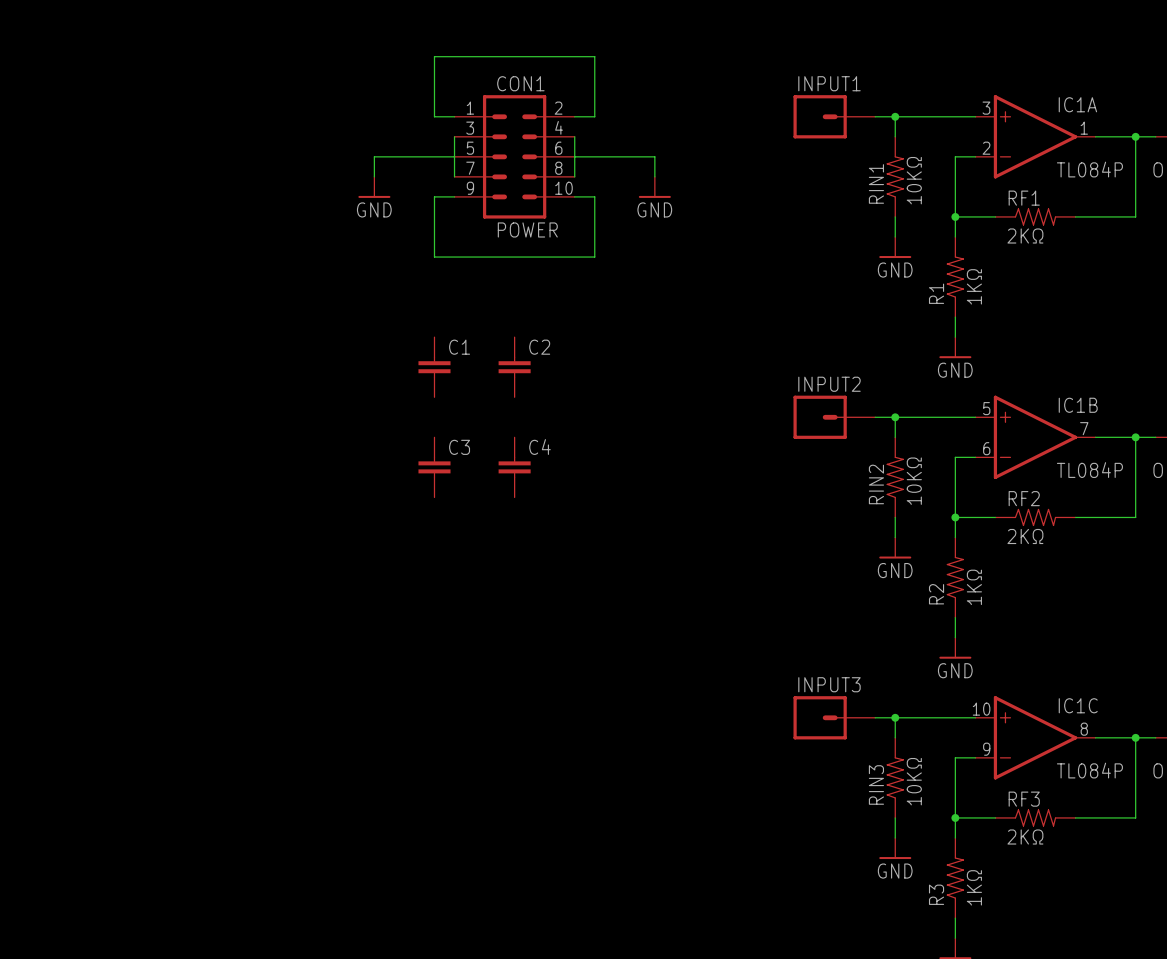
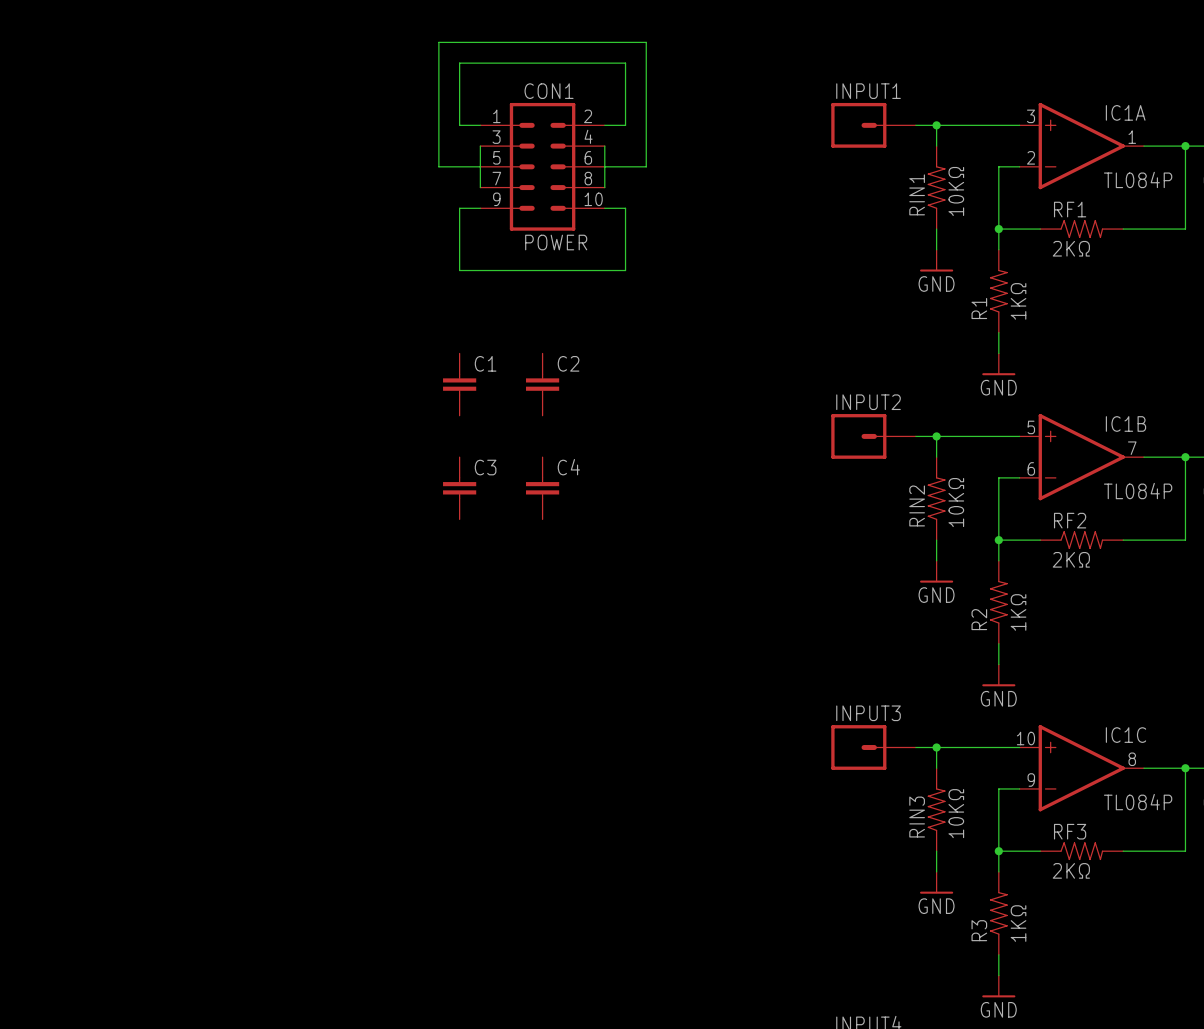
wire: (414, 156) (374, 156) (374, 176) -> (438, 166) (438, 42) (646, 42) (646, 166)
wire: (614, 156) (654, 156) (654, 176) -> none
power symbol: GND (374, 187) -> none
power symbol: GND (654, 187) -> none

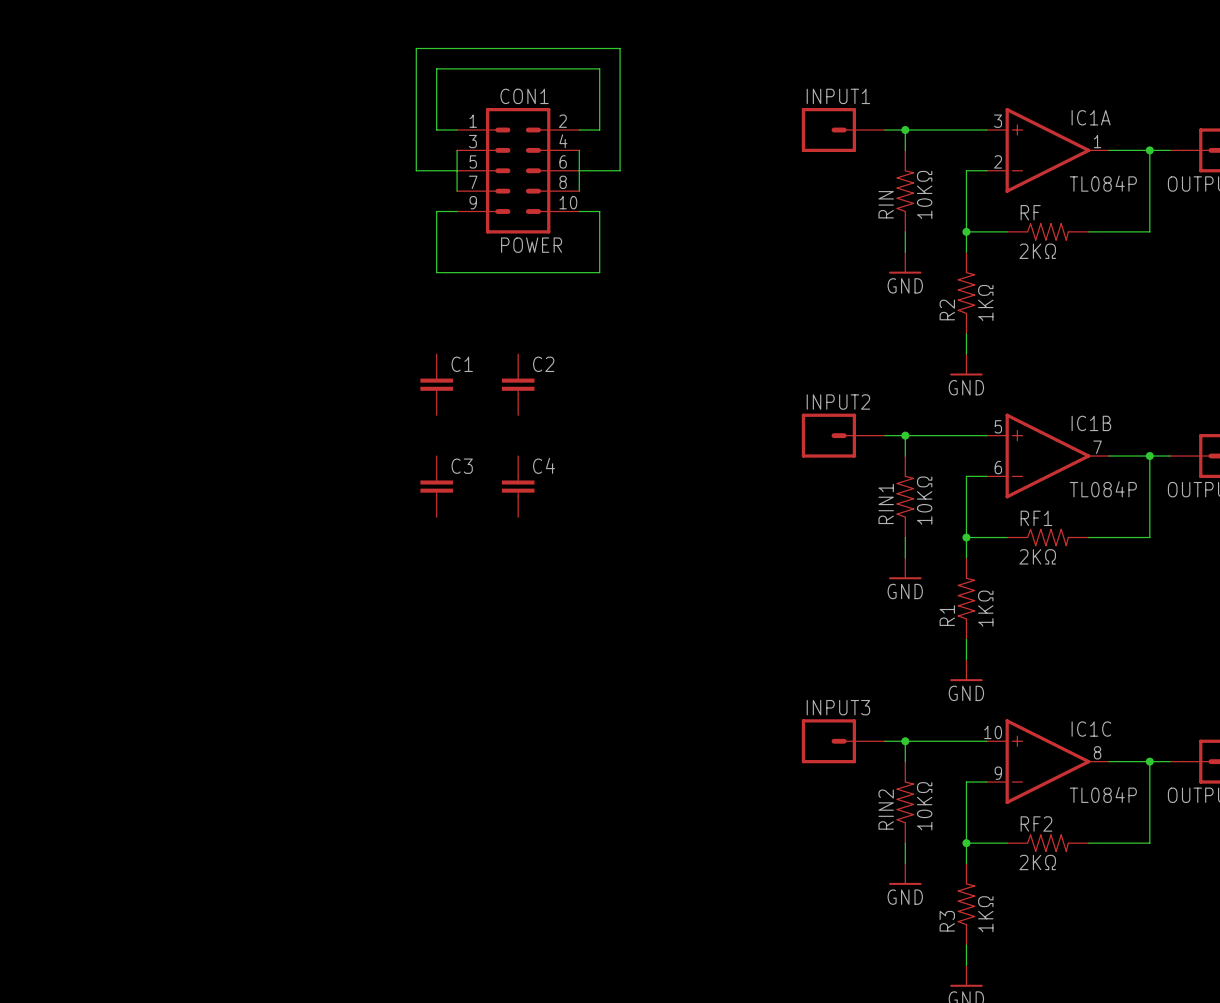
RIN1 name: RIN1 (917, 194) -> RIN (886, 204)
RF1 name: RF1 (1070, 209) -> RF (1030, 212)
R1 name: R1 (979, 308) -> R2 (947, 309)
RIN2 name: RIN2 (917, 505) -> RIN1 (886, 503)
RF2 name: RF2 (1070, 520) -> RF1 (1036, 518)
R2 name: R2 (979, 619) -> R1 (947, 615)
RIN3 name: RIN3 (917, 817) -> RIN2 (886, 809)
RF3 name: RF3 (1070, 831) -> RF2 (1036, 823)

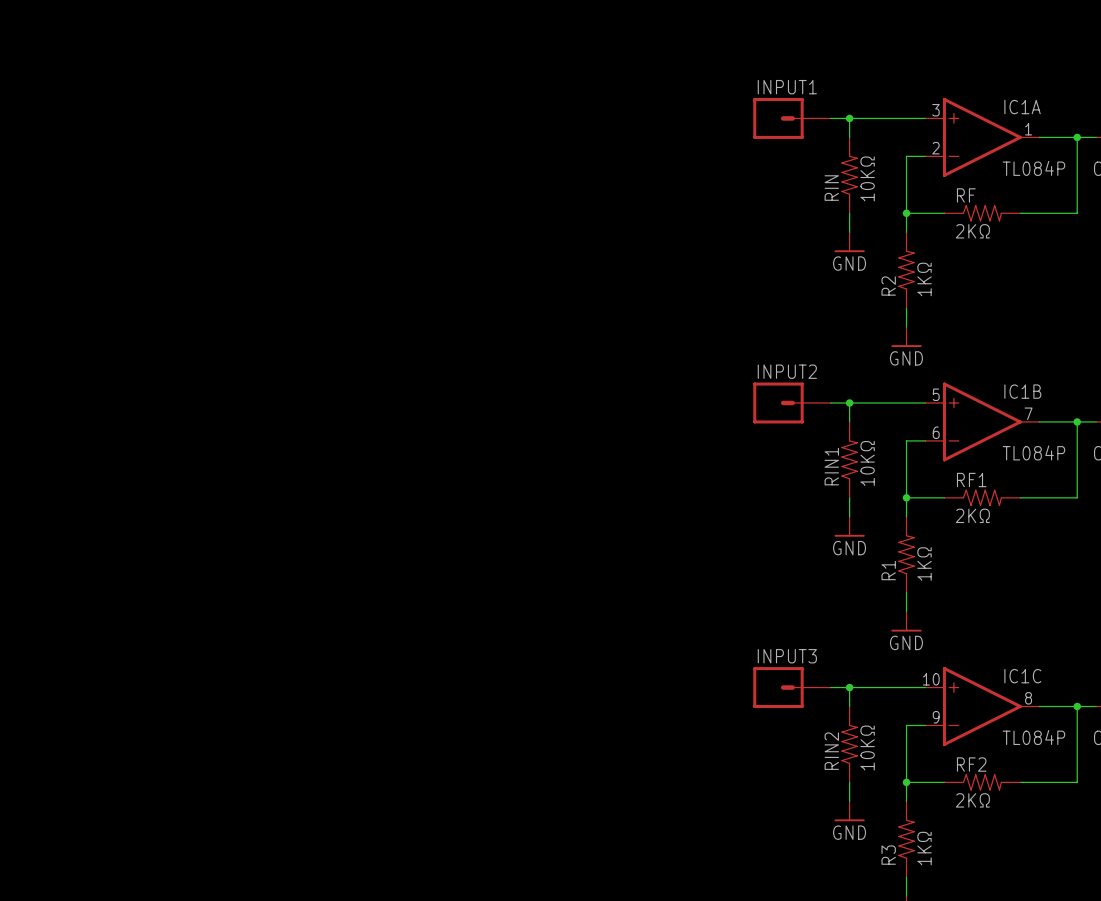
wire: (457, 130) (436, 130) (436, 68) (599, 68) (599, 130) (579, 130) -> none
wire: (457, 150) (457, 191) -> none
wire: (579, 150) (579, 191) -> none
wire: (457, 170) (416, 170) (416, 48) (620, 48) (620, 170) (579, 170) -> none
CON1: POWER (518, 170) -> none
wire: (457, 211) (436, 211) (436, 272) (599, 272) (599, 211) (579, 211) -> none
C1: (436, 384) -> none
C2: (518, 384) -> none
C3: (436, 486) -> none
C4: (518, 486) -> none

